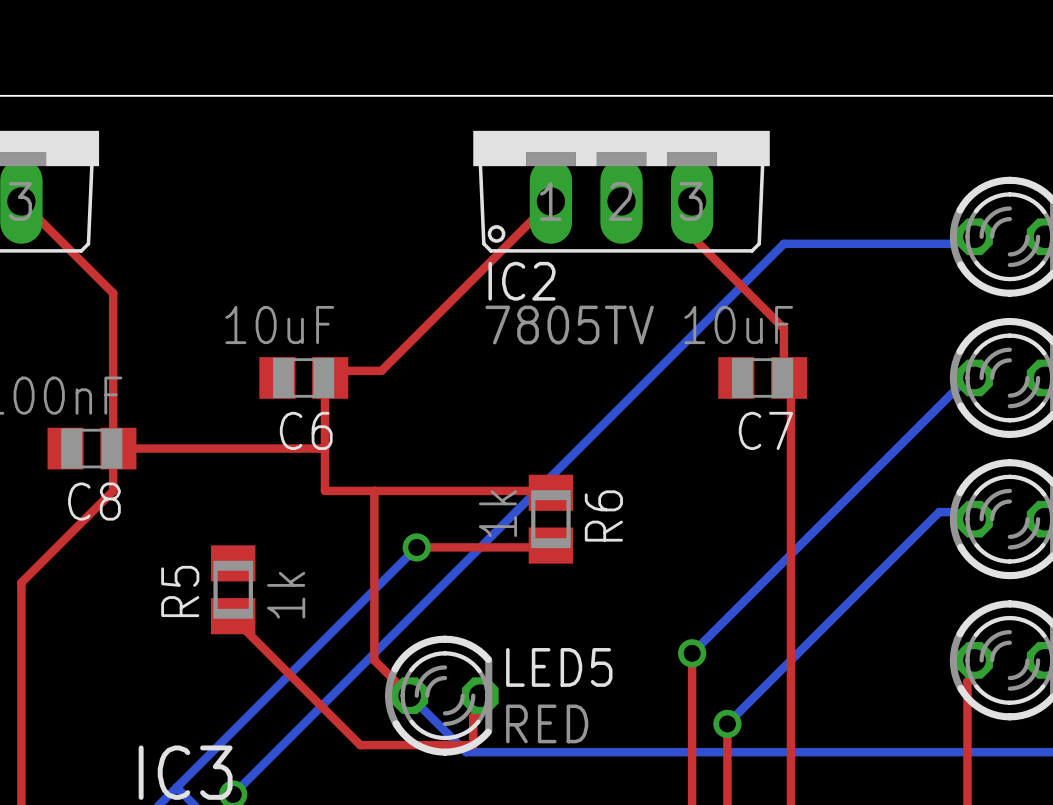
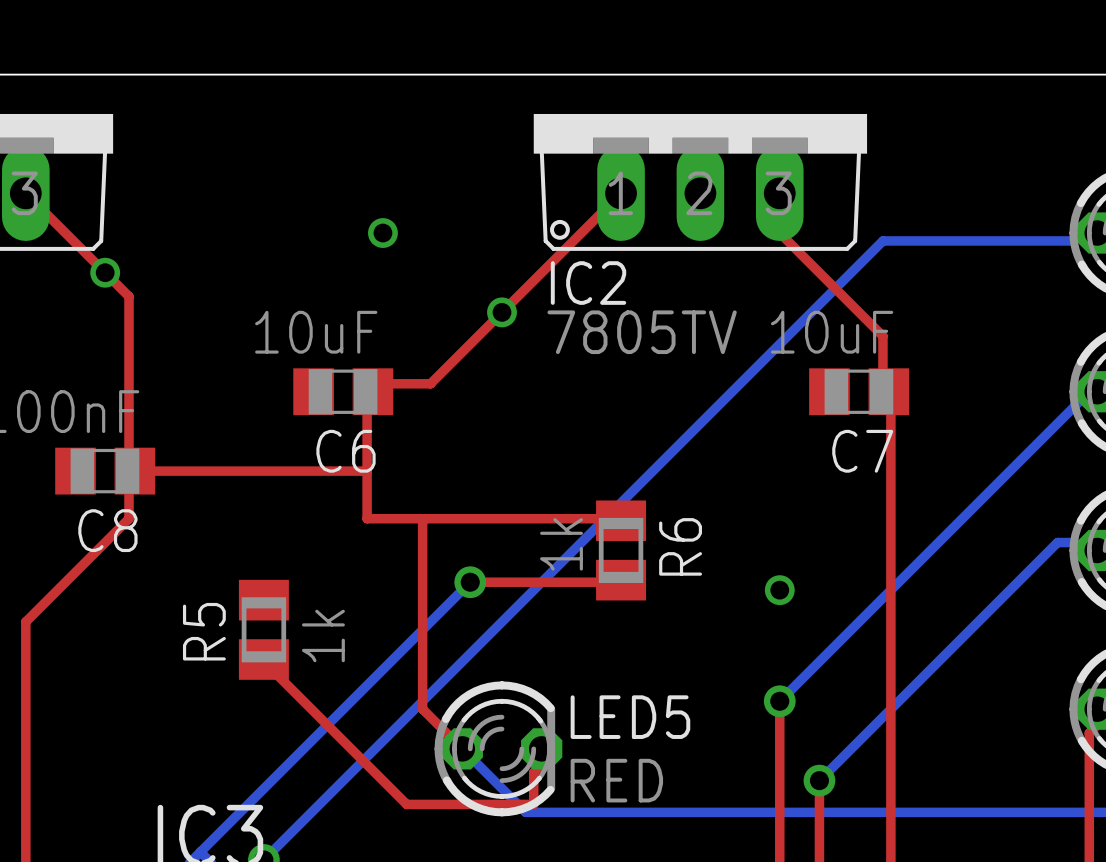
via: none -> (382, 233)
via: none -> (105, 272)
via: none -> (502, 312)
via: none -> (779, 590)

